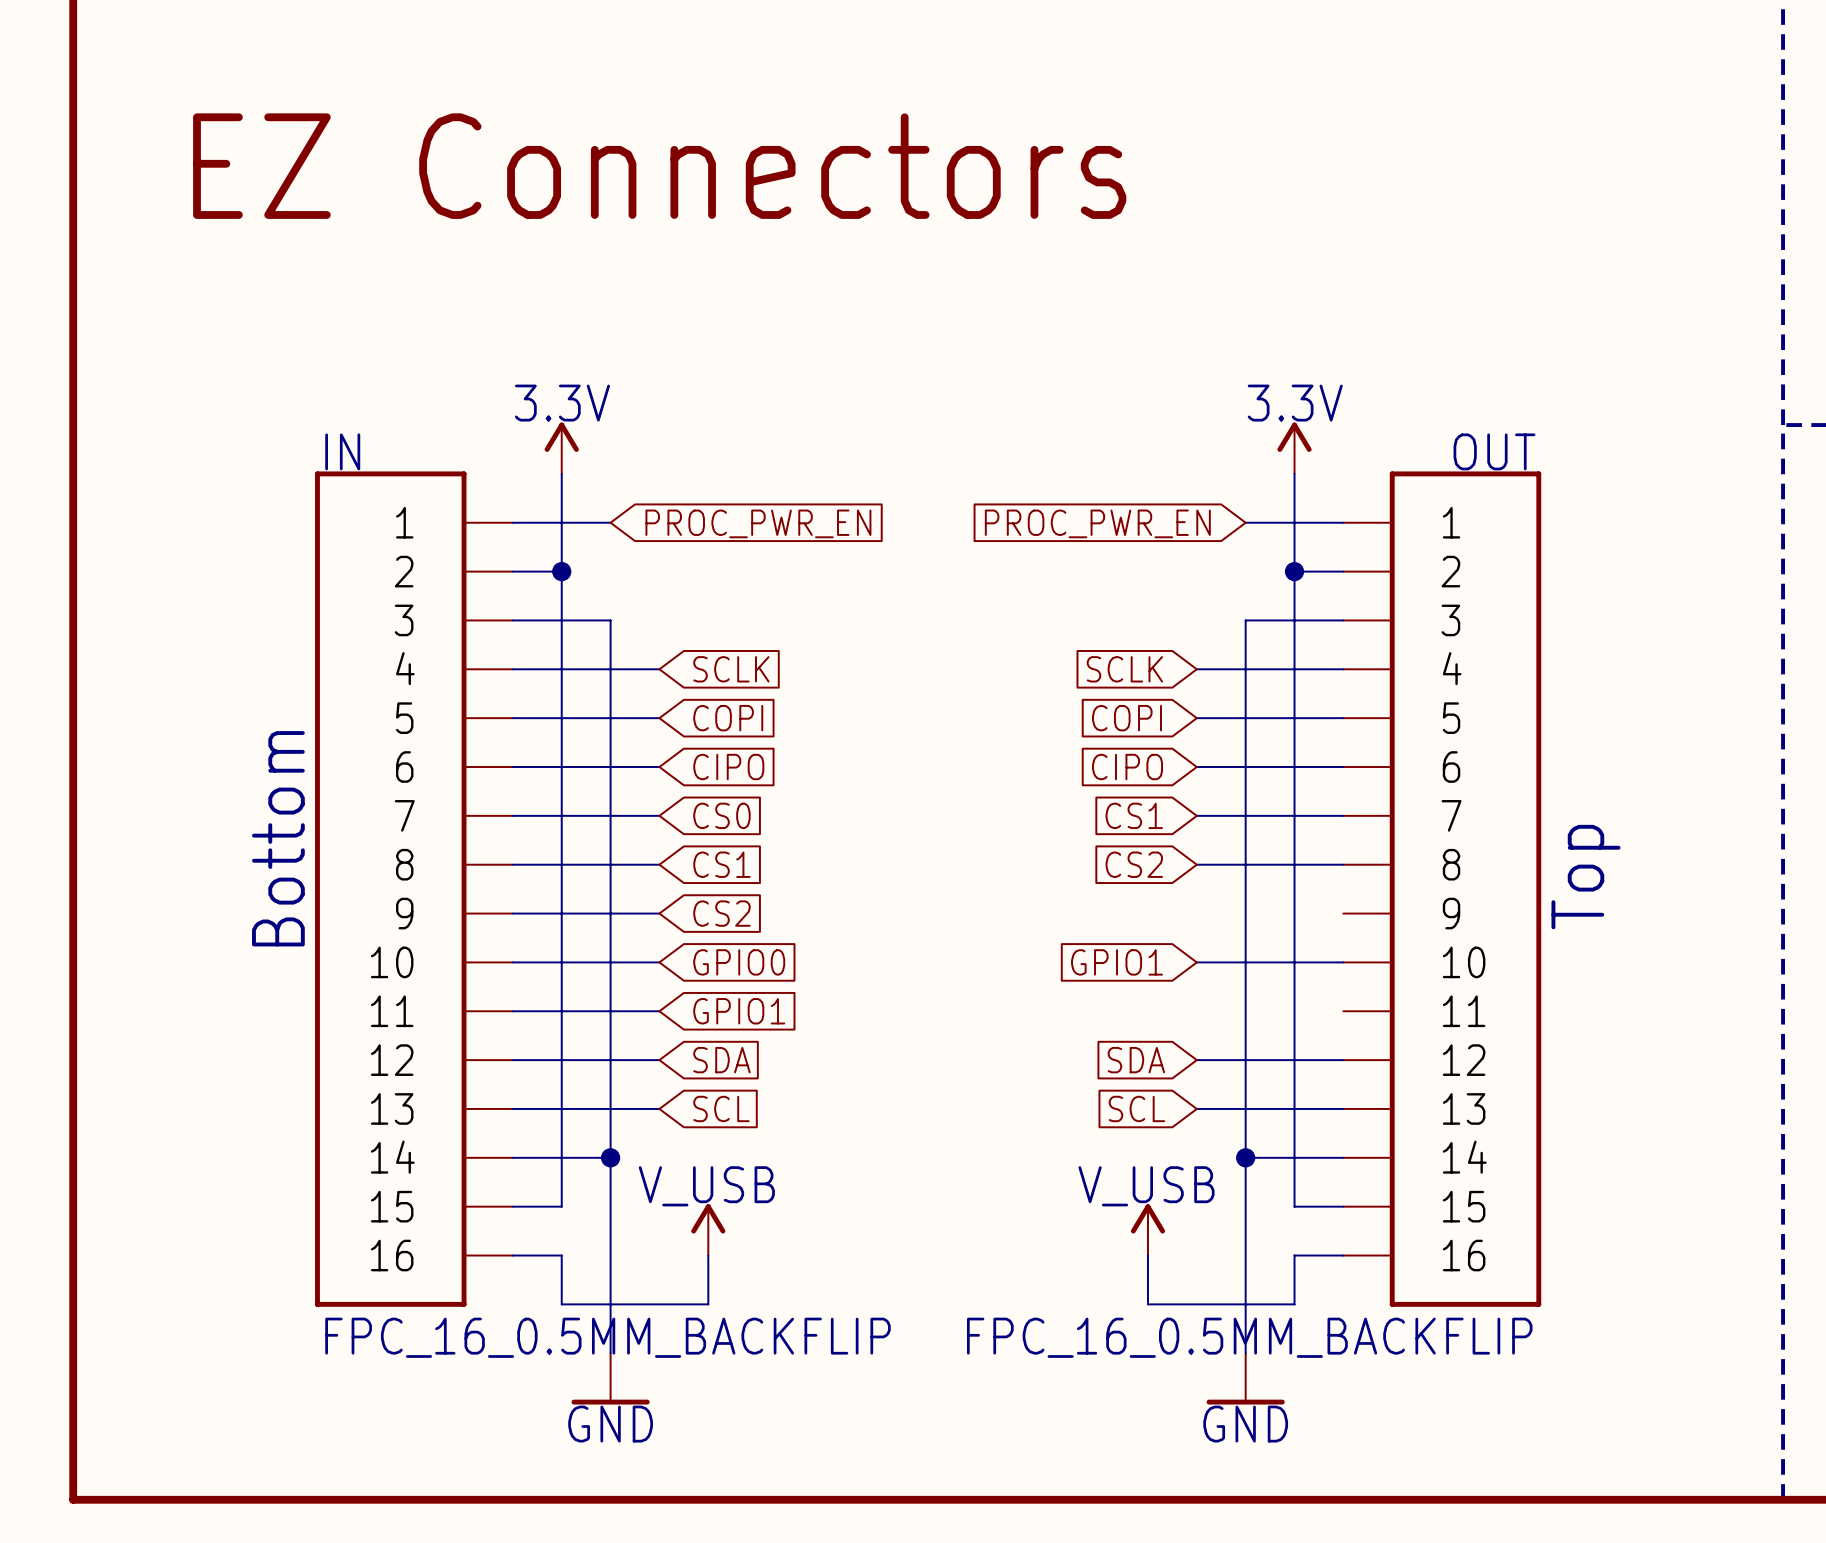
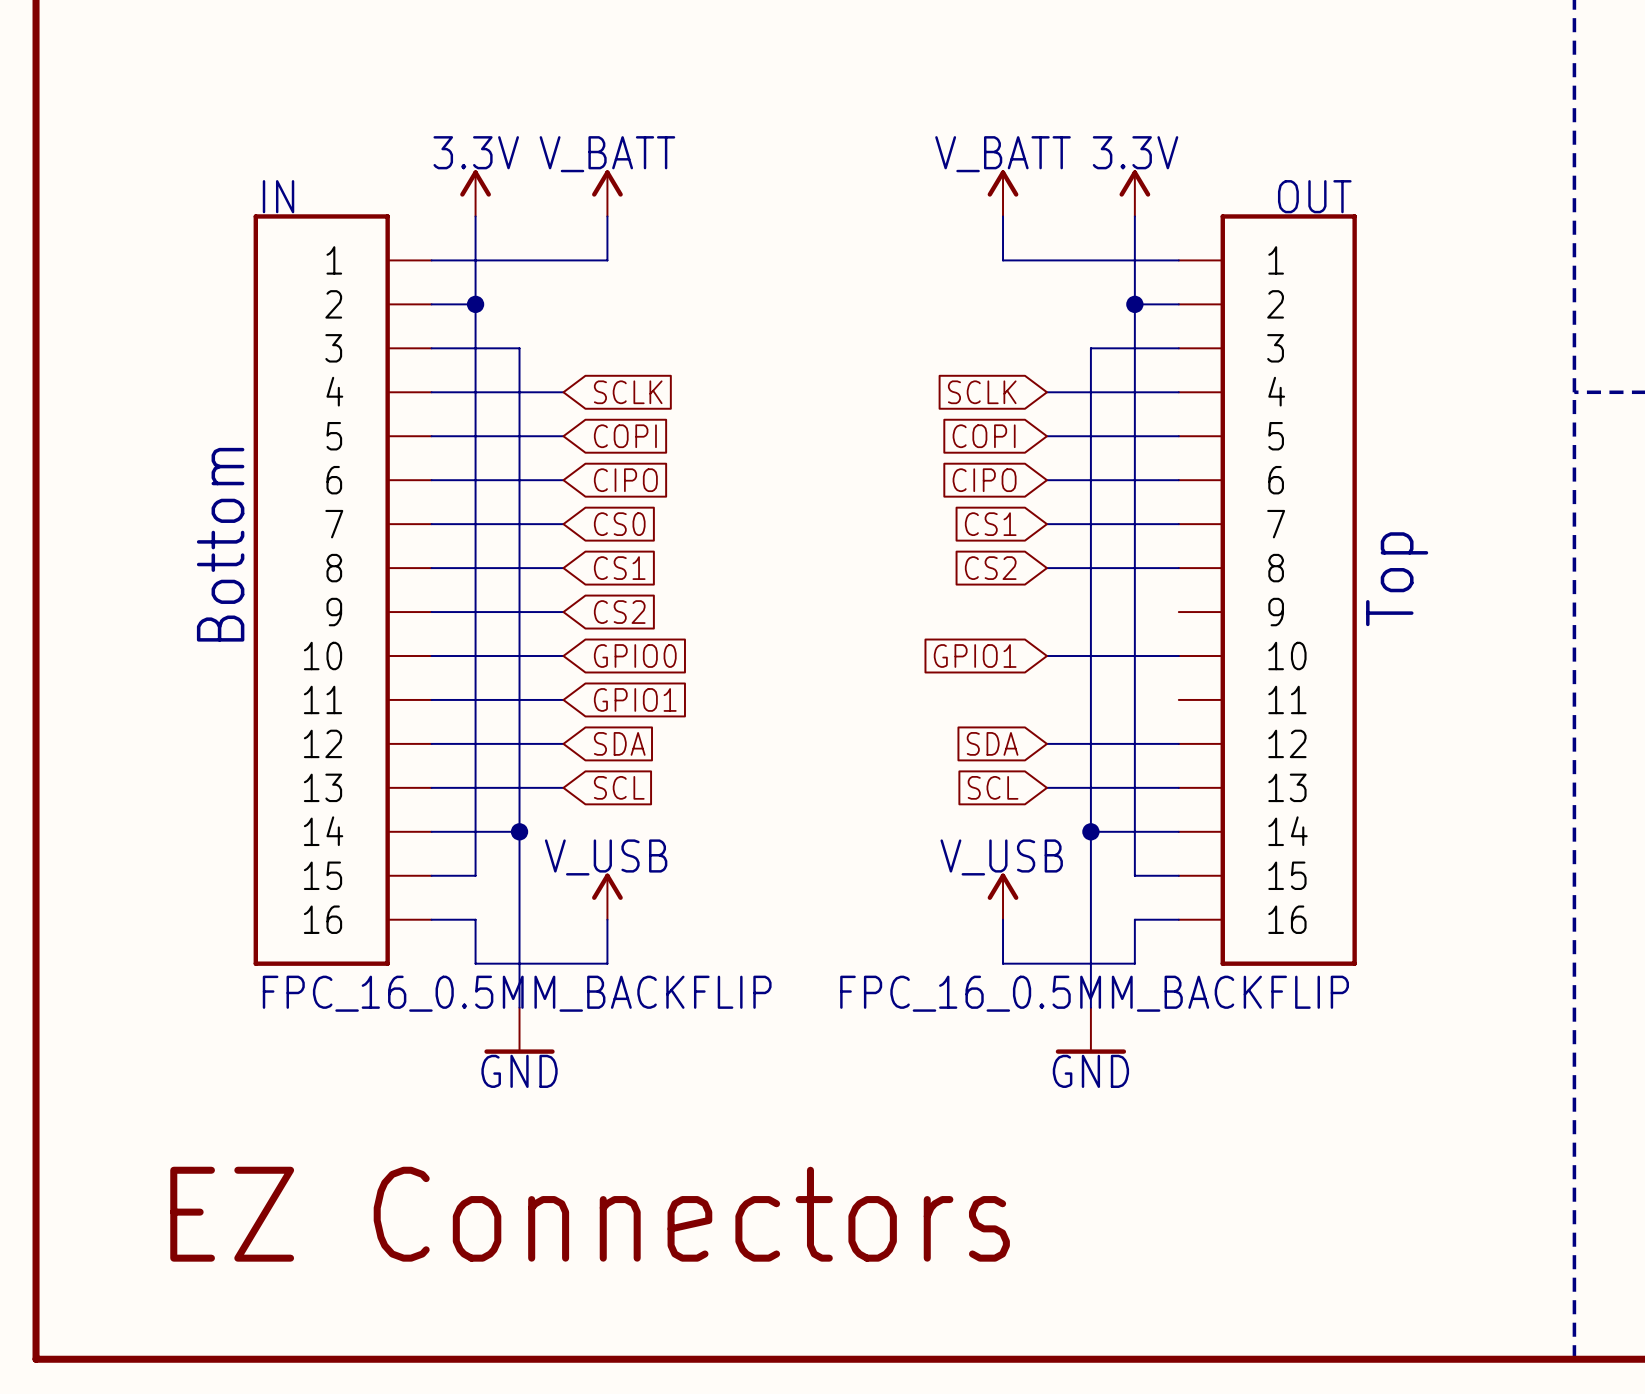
text: EZ Connectors (659, 166) -> none
power symbol: none -> V_BATT (607, 193)
power symbol: none -> V_BATT (1003, 193)
wire: none -> (475, 216) (475, 436)
wire: none -> (607, 216) (607, 260) (431, 260)
wire: none -> (1003, 216) (1003, 260) (1178, 260)
wire: none -> (1134, 216) (1134, 436)
wire: none -> (431, 304) (475, 304)
junction: none -> (475, 304)
wire: none -> (1134, 304) (1178, 304)
junction: none -> (1134, 304)
wire: none -> (431, 348) (519, 348) (519, 568) (563, 568)
wire: none -> (1178, 348) (1090, 348) (1090, 568) (1046, 568)
wire: none -> (431, 392) (563, 392)
global label: none -> SCLK (628, 392)
power symbol position: 3.3V (561, 448) -> 3.3V (475, 193)
power symbol position: 3.3V (1294, 448) -> 3.3V (1134, 193)
wire: none -> (431, 436) (563, 436)
global label: none -> COPI (625, 436)
global label: none -> COPI (984, 436)
global label: none -> CIPO (625, 480)
wire: none -> (1046, 480) (1090, 480)
global label: PROC_PWR_EN (758, 523) -> none
global label: PROC_PWR_EN (1097, 523) -> none
wire: none -> (475, 524) (563, 524)
junction: (561, 571) -> none
global label: none -> CS0 (619, 524)
global label: none -> CS1 (990, 524)
wire: none -> (1046, 524) (1134, 524)
junction: (1294, 571) -> none
global label: none -> CS1 (619, 568)
global label: none -> CS2 (990, 568)
global label: SCLK (731, 669) -> CS2 (619, 612)
global label position: SCLK (1124, 669) -> SCLK (982, 392)
wire: (1196, 669) (1343, 669) -> (1046, 392) (1178, 392)
global label: COPI (728, 718) -> GPIO0 (635, 656)
global label: COPI (1126, 718) -> GPIO1 (975, 656)
global label: CIPO (728, 767) -> GPIO1 (635, 699)
global label position: CIPO (1127, 767) -> CIPO (984, 480)
wire: (1196, 767) (1343, 767) -> (1046, 436) (1178, 436)
global label: CS0 (721, 815) -> SDA (619, 743)
global label: CS1 (1134, 815) -> SDA (992, 743)
text position: Bottom (278, 838) -> Bottom (220, 544)
global label: CS1 (721, 864) -> SCL (619, 787)
global label: CS2 (1134, 864) -> SCL (993, 787)
text position: Top (1586, 877) -> Top (1397, 579)
IN position: (413, 889) -> (342, 590)
OUT position: (1442, 889) -> (1267, 590)
wire: (610, 913) (659, 913) -> (519, 480) (563, 480)
junction: none -> (519, 831)
global label: CS2 (721, 913) -> none
junction: none -> (1090, 831)
wire: (659, 962) (561, 962) (561, 1011) (659, 1011) -> none
global label: GPIO0 (739, 962) -> none
global label: GPIO1 (1117, 962) -> none
wire: (1196, 962) (1294, 962) (1294, 1011) -> (1178, 919) (1134, 919)
wire: none -> (607, 919) (607, 963) (563, 963)
global label: GPIO1 (739, 1011) -> none
wire: none -> (1003, 919) (1003, 963) (1046, 963)
wire: (512, 1060) (561, 1060) (561, 1206) (512, 1206) -> none
global label: SDA (721, 1060) -> none
global label: SDA (1136, 1060) -> none
wire: (1343, 1060) (1294, 1060) (1294, 1206) (1343, 1206) -> none
wire: (512, 1108) (659, 1108) -> none
wire: (610, 1108) (610, 1353) -> none
global label: SCL (721, 1108) -> none
global label: SCL (1136, 1108) -> none
wire: (1196, 1108) (1343, 1108) -> none
wire: (1245, 1108) (1245, 1353) -> none
wire: (512, 1157) (610, 1157) -> none
junction: (610, 1157) -> none
wire: (1245, 1157) (1343, 1157) -> (1090, 831) (1178, 831)
junction: (1245, 1157) -> none
power symbol position: V_USB (708, 1229) -> V_USB (607, 896)
power symbol position: V_USB (1147, 1229) -> V_USB (1003, 896)
wire: (512, 1255) (561, 1255) (561, 1304) (708, 1304) (708, 1255) -> none
wire: (1147, 1255) (1147, 1304) (1294, 1304) (1294, 1255) (1343, 1255) -> none
text: none -> EZ Connectors (590, 1214)
power symbol position: GND (610, 1378) -> GND (519, 1030)
power symbol position: GND (1245, 1378) -> GND (1090, 1030)

